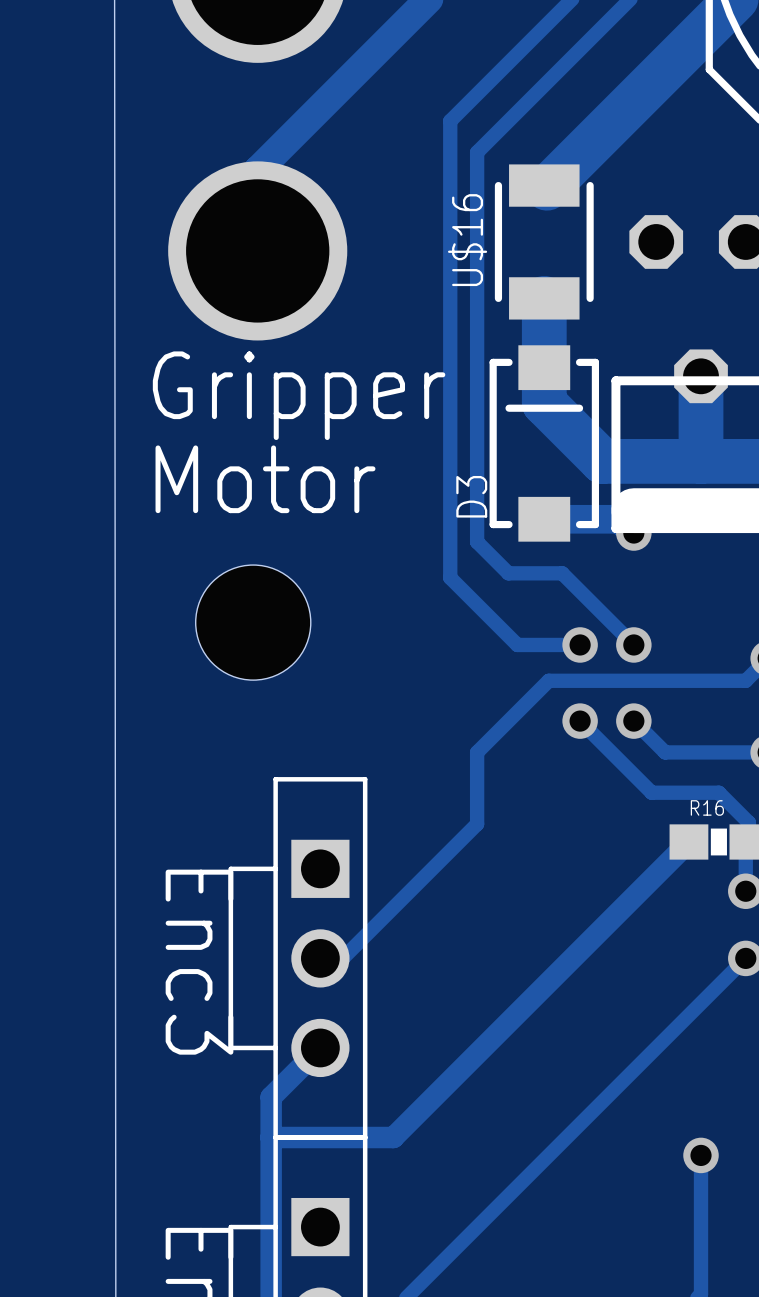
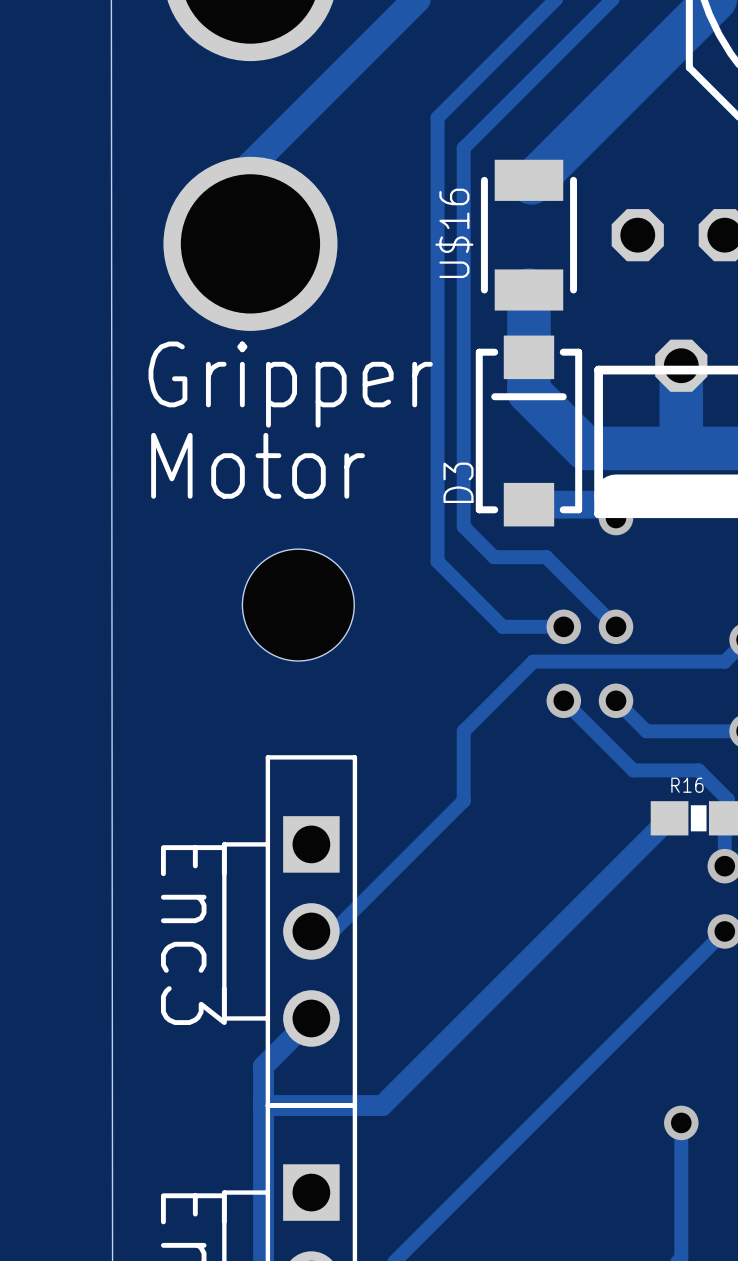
part position: (253, 622) -> (298, 605)

